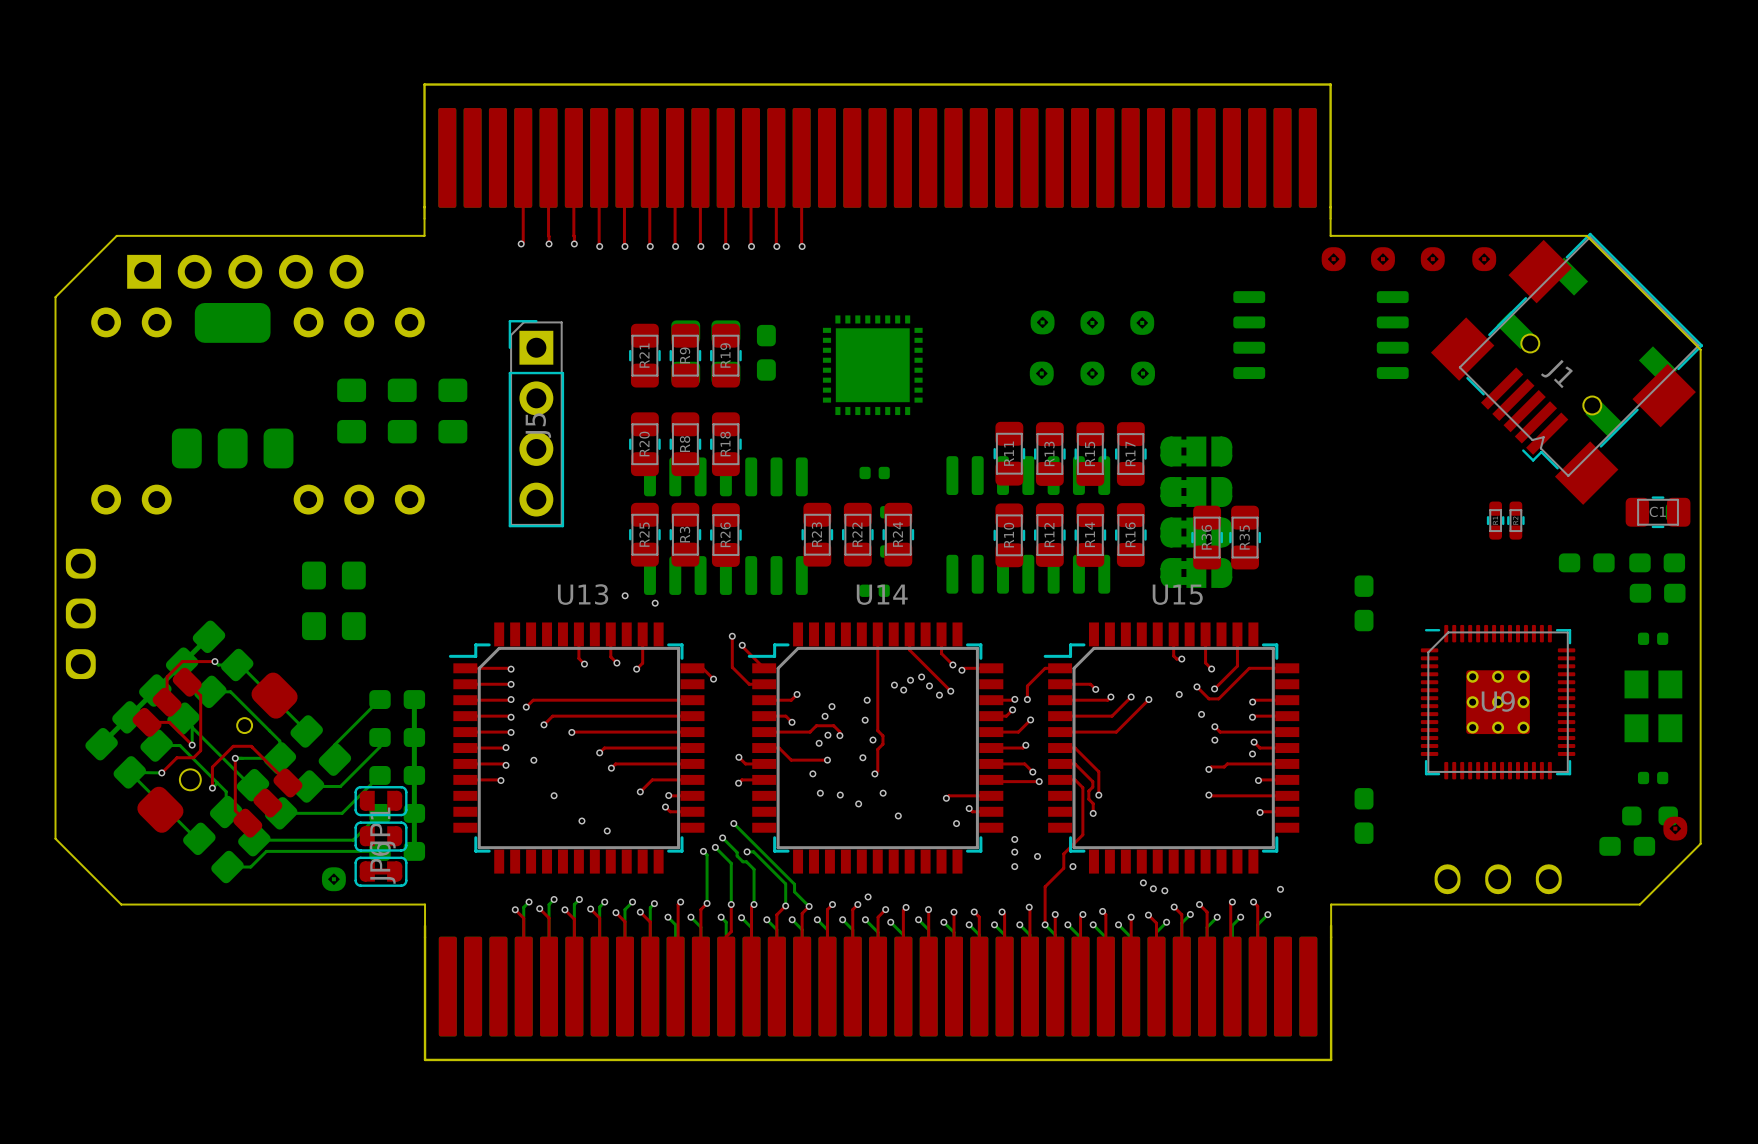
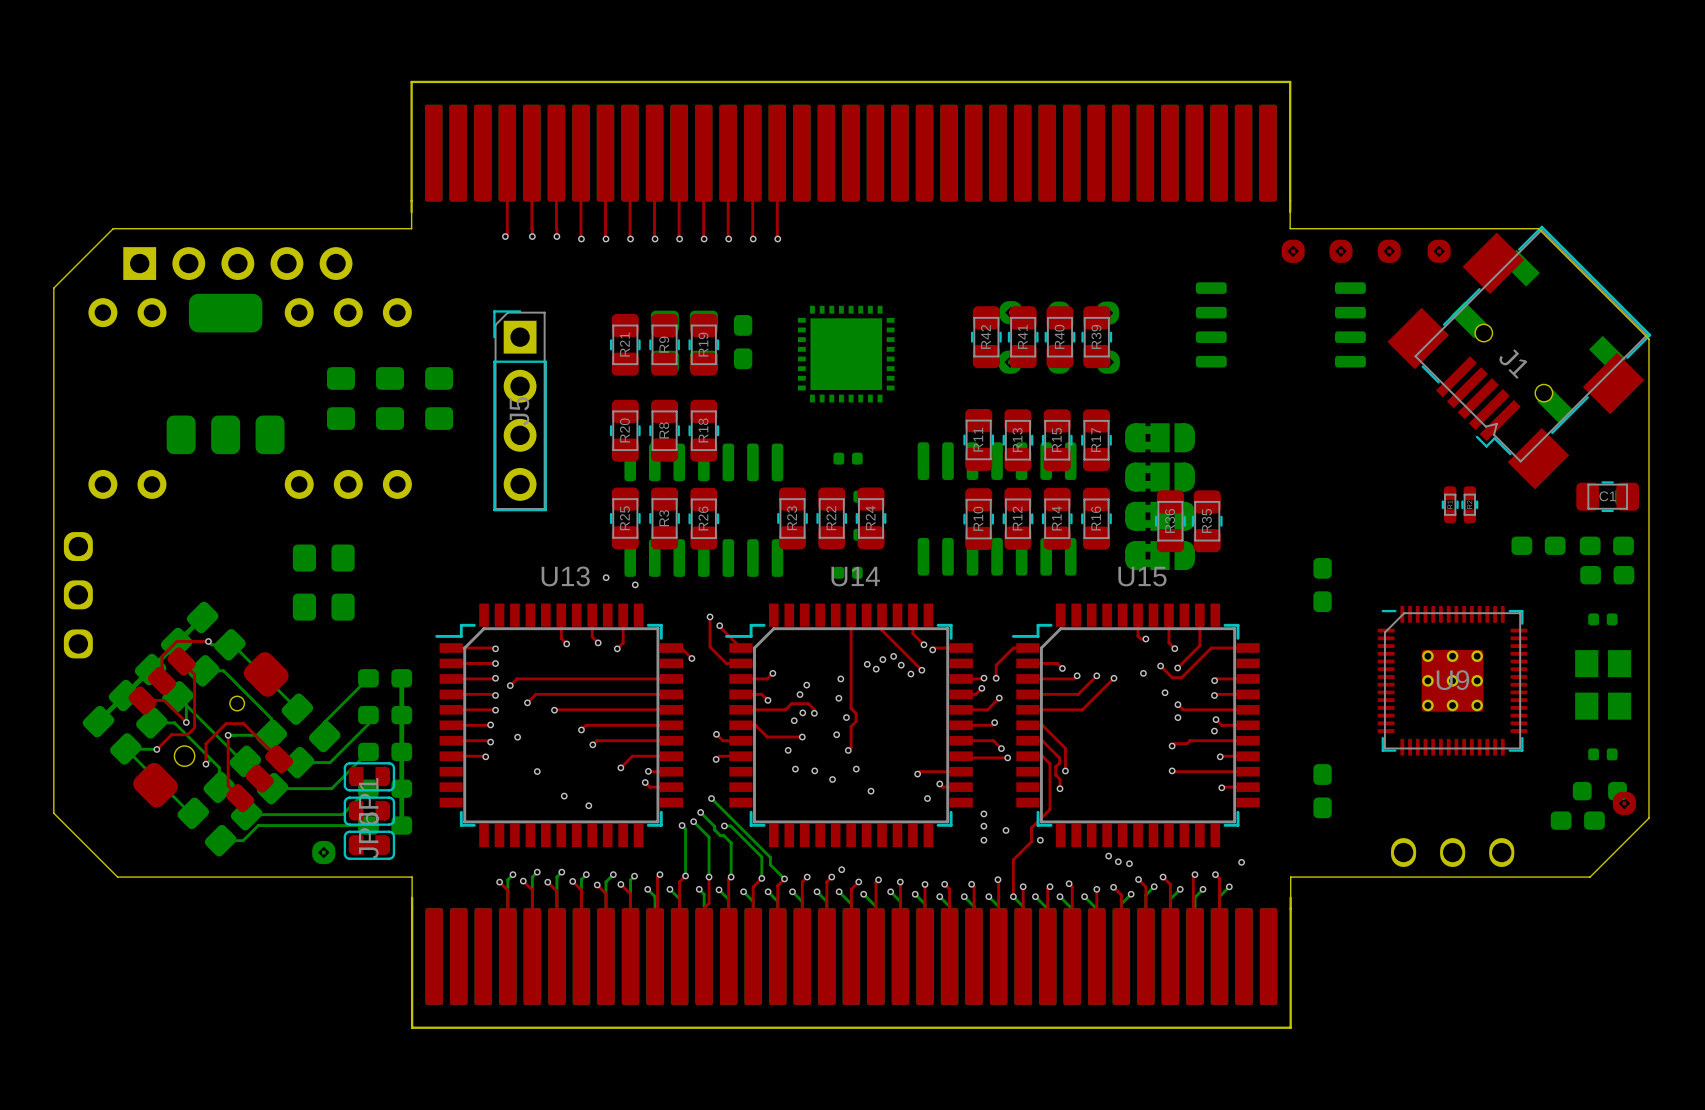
R42: none -> (986, 337)
R41: none -> (1023, 337)
R40: none -> (1059, 337)
R39: none -> (1096, 337)

